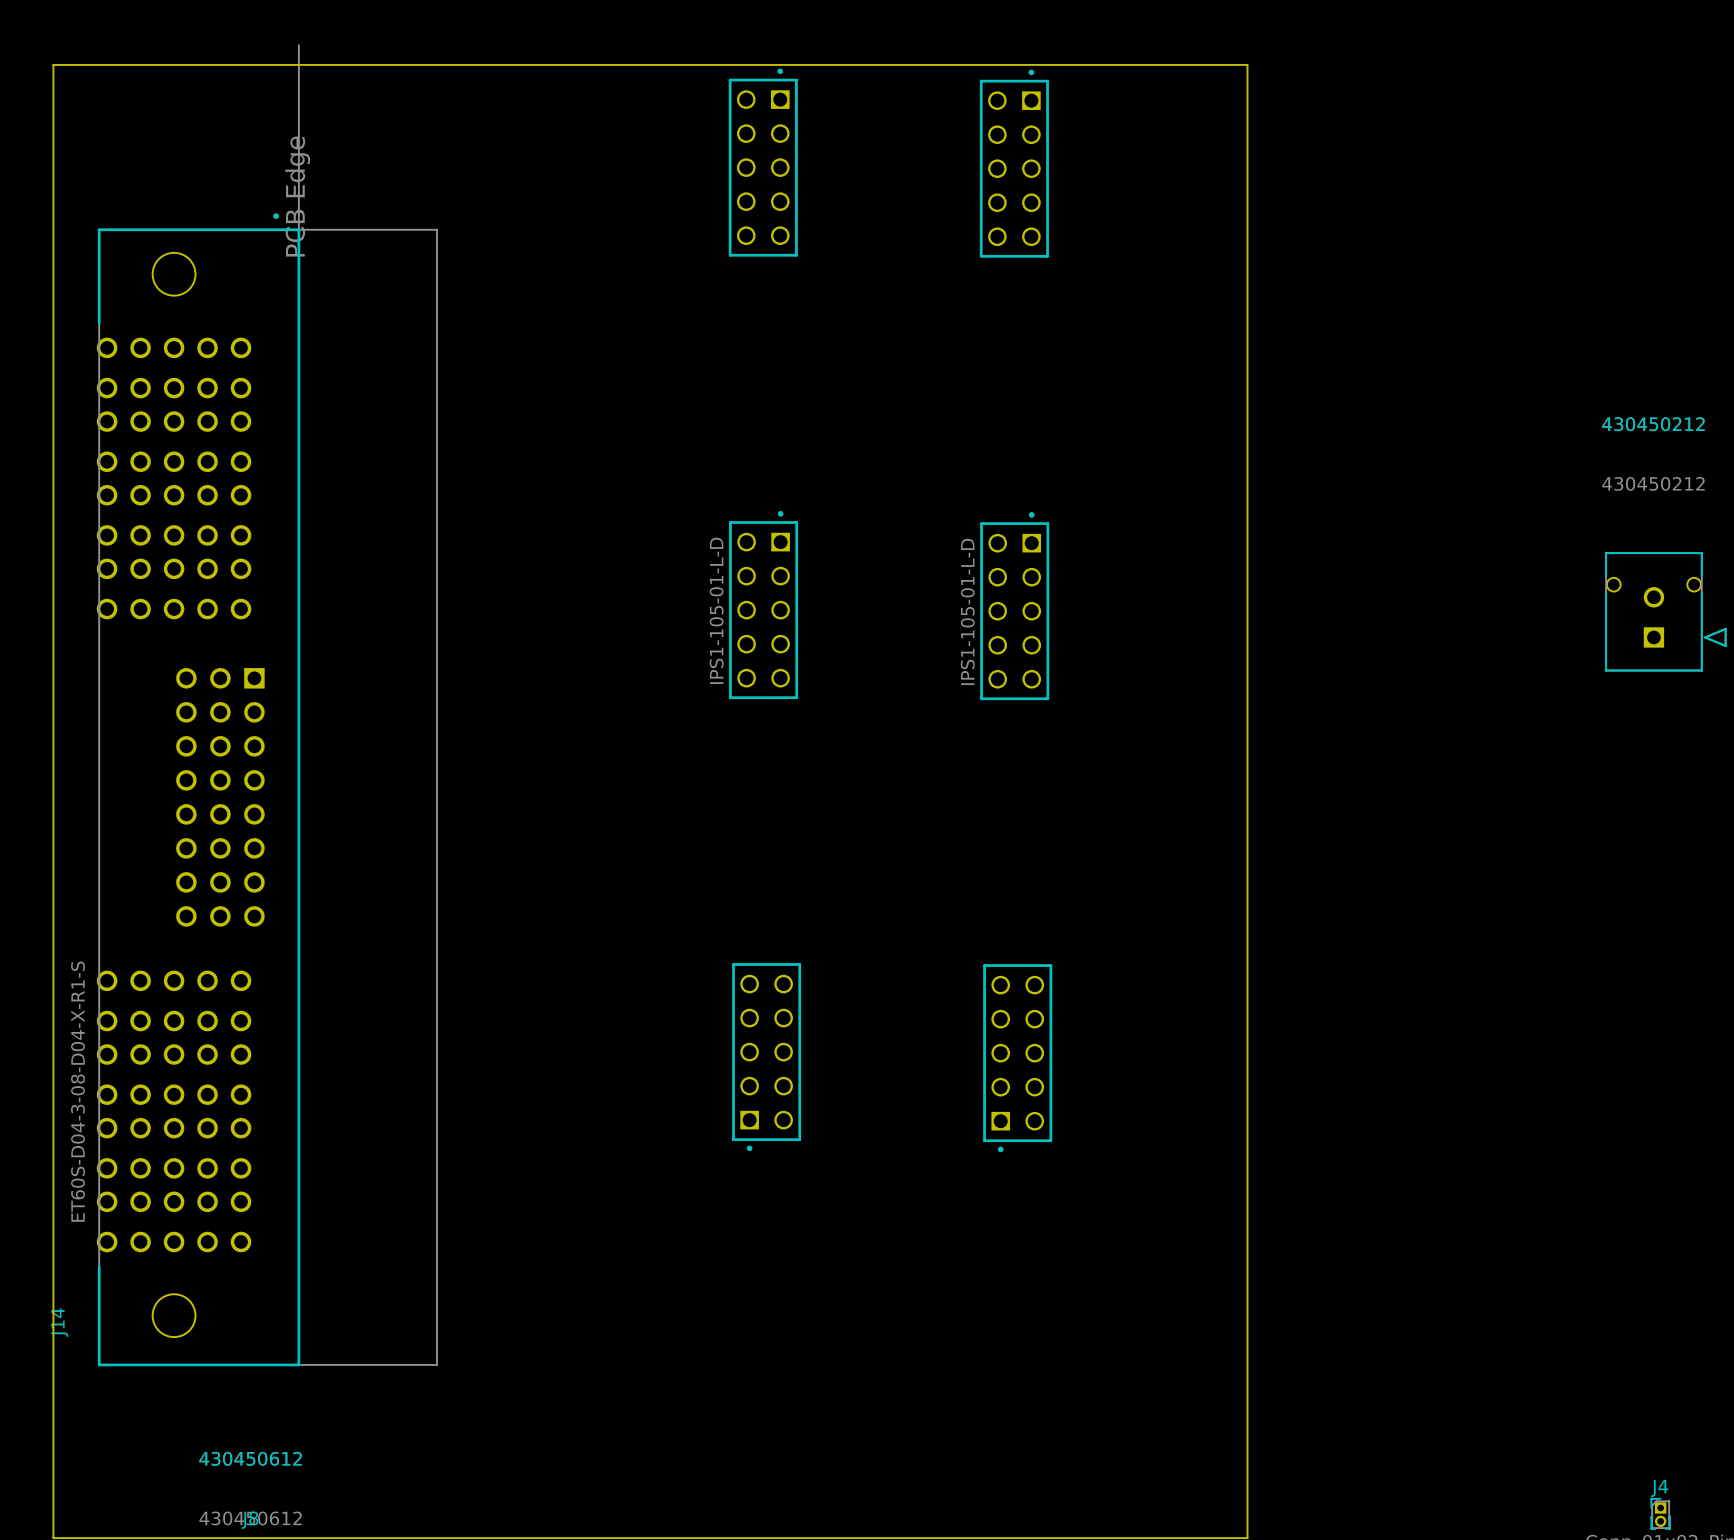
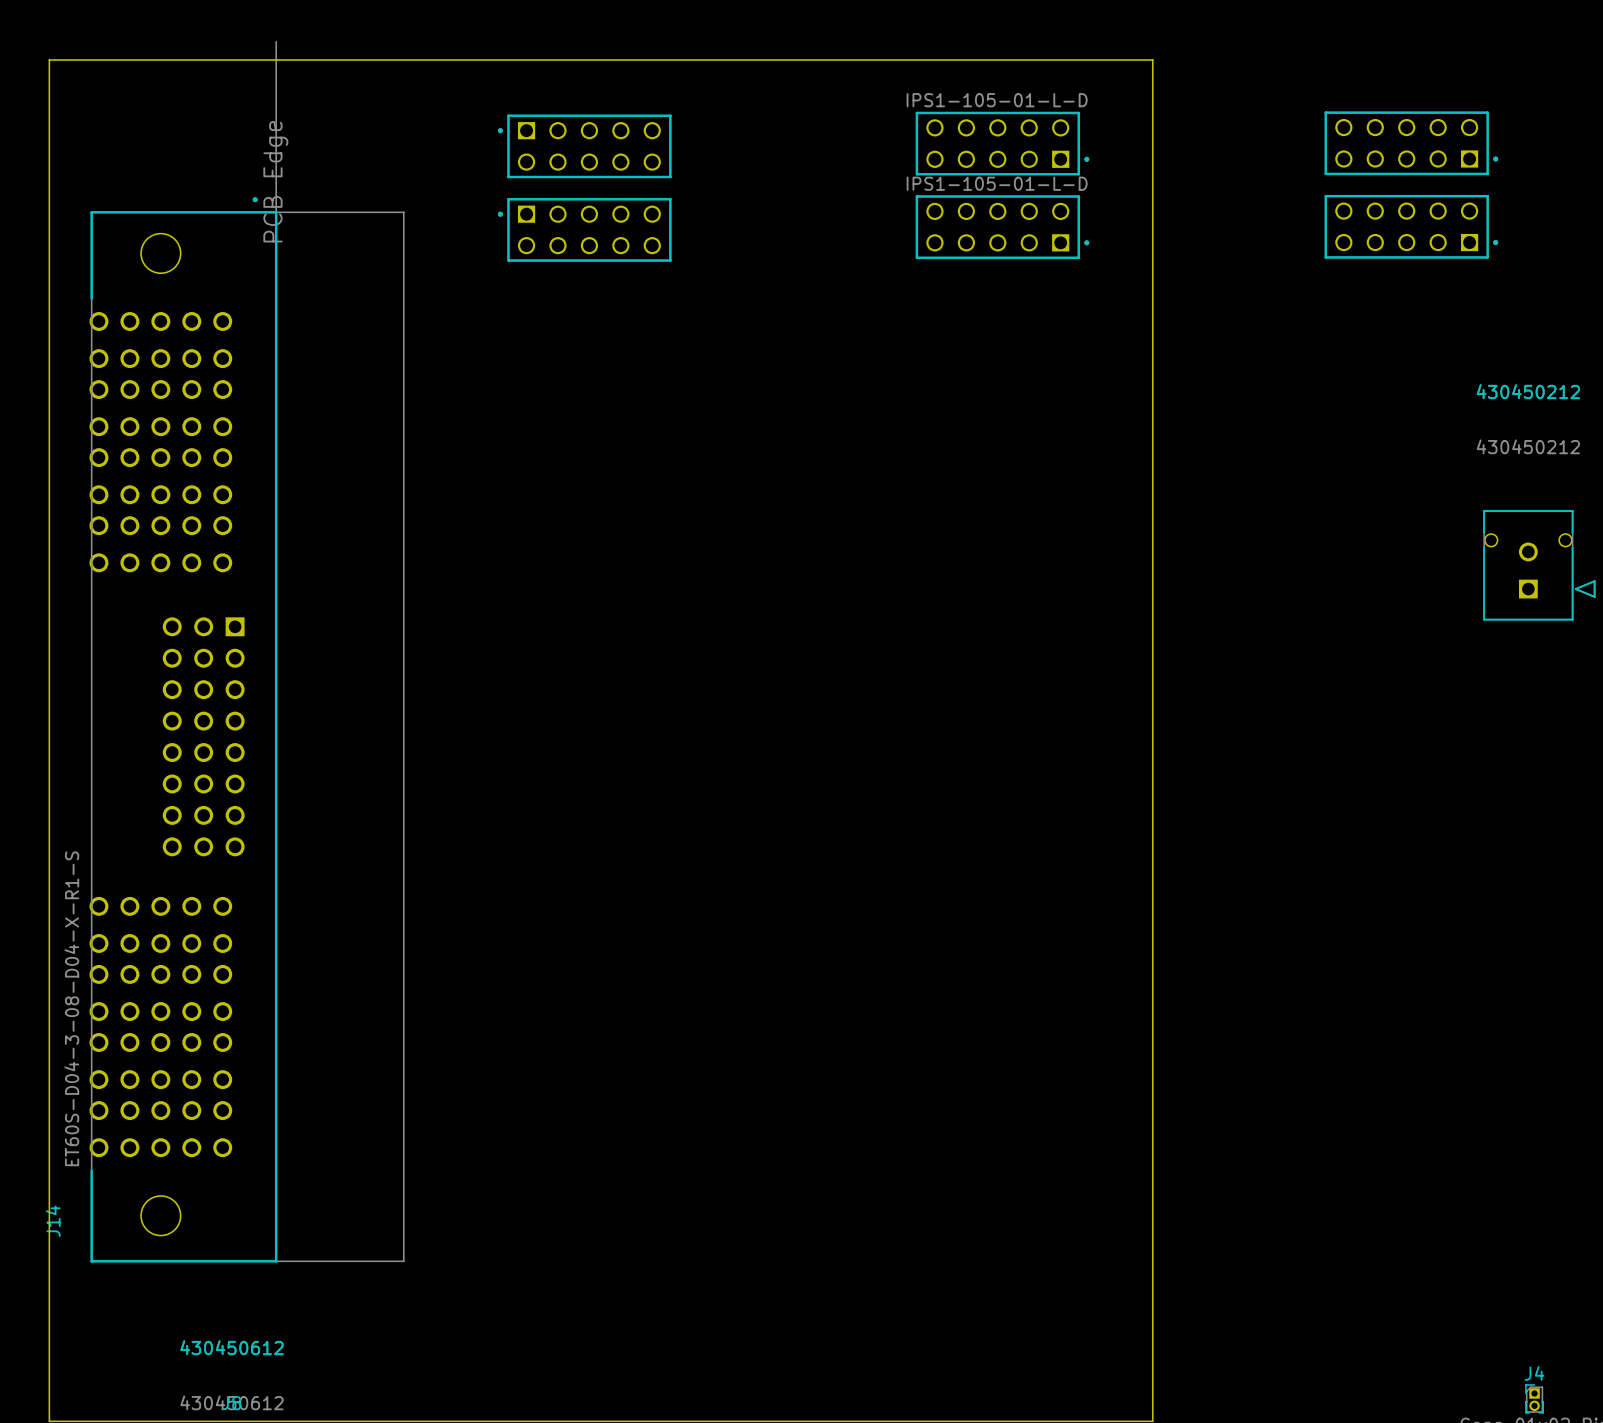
part: none -> IPS1-105-01-L-D (998, 144)
part: none -> IPS1-105-01-L-D (998, 228)
part: IPS1-105-01-L-D (764, 609) -> none
part: IPS1-105-01-L-D (1016, 610) -> none

